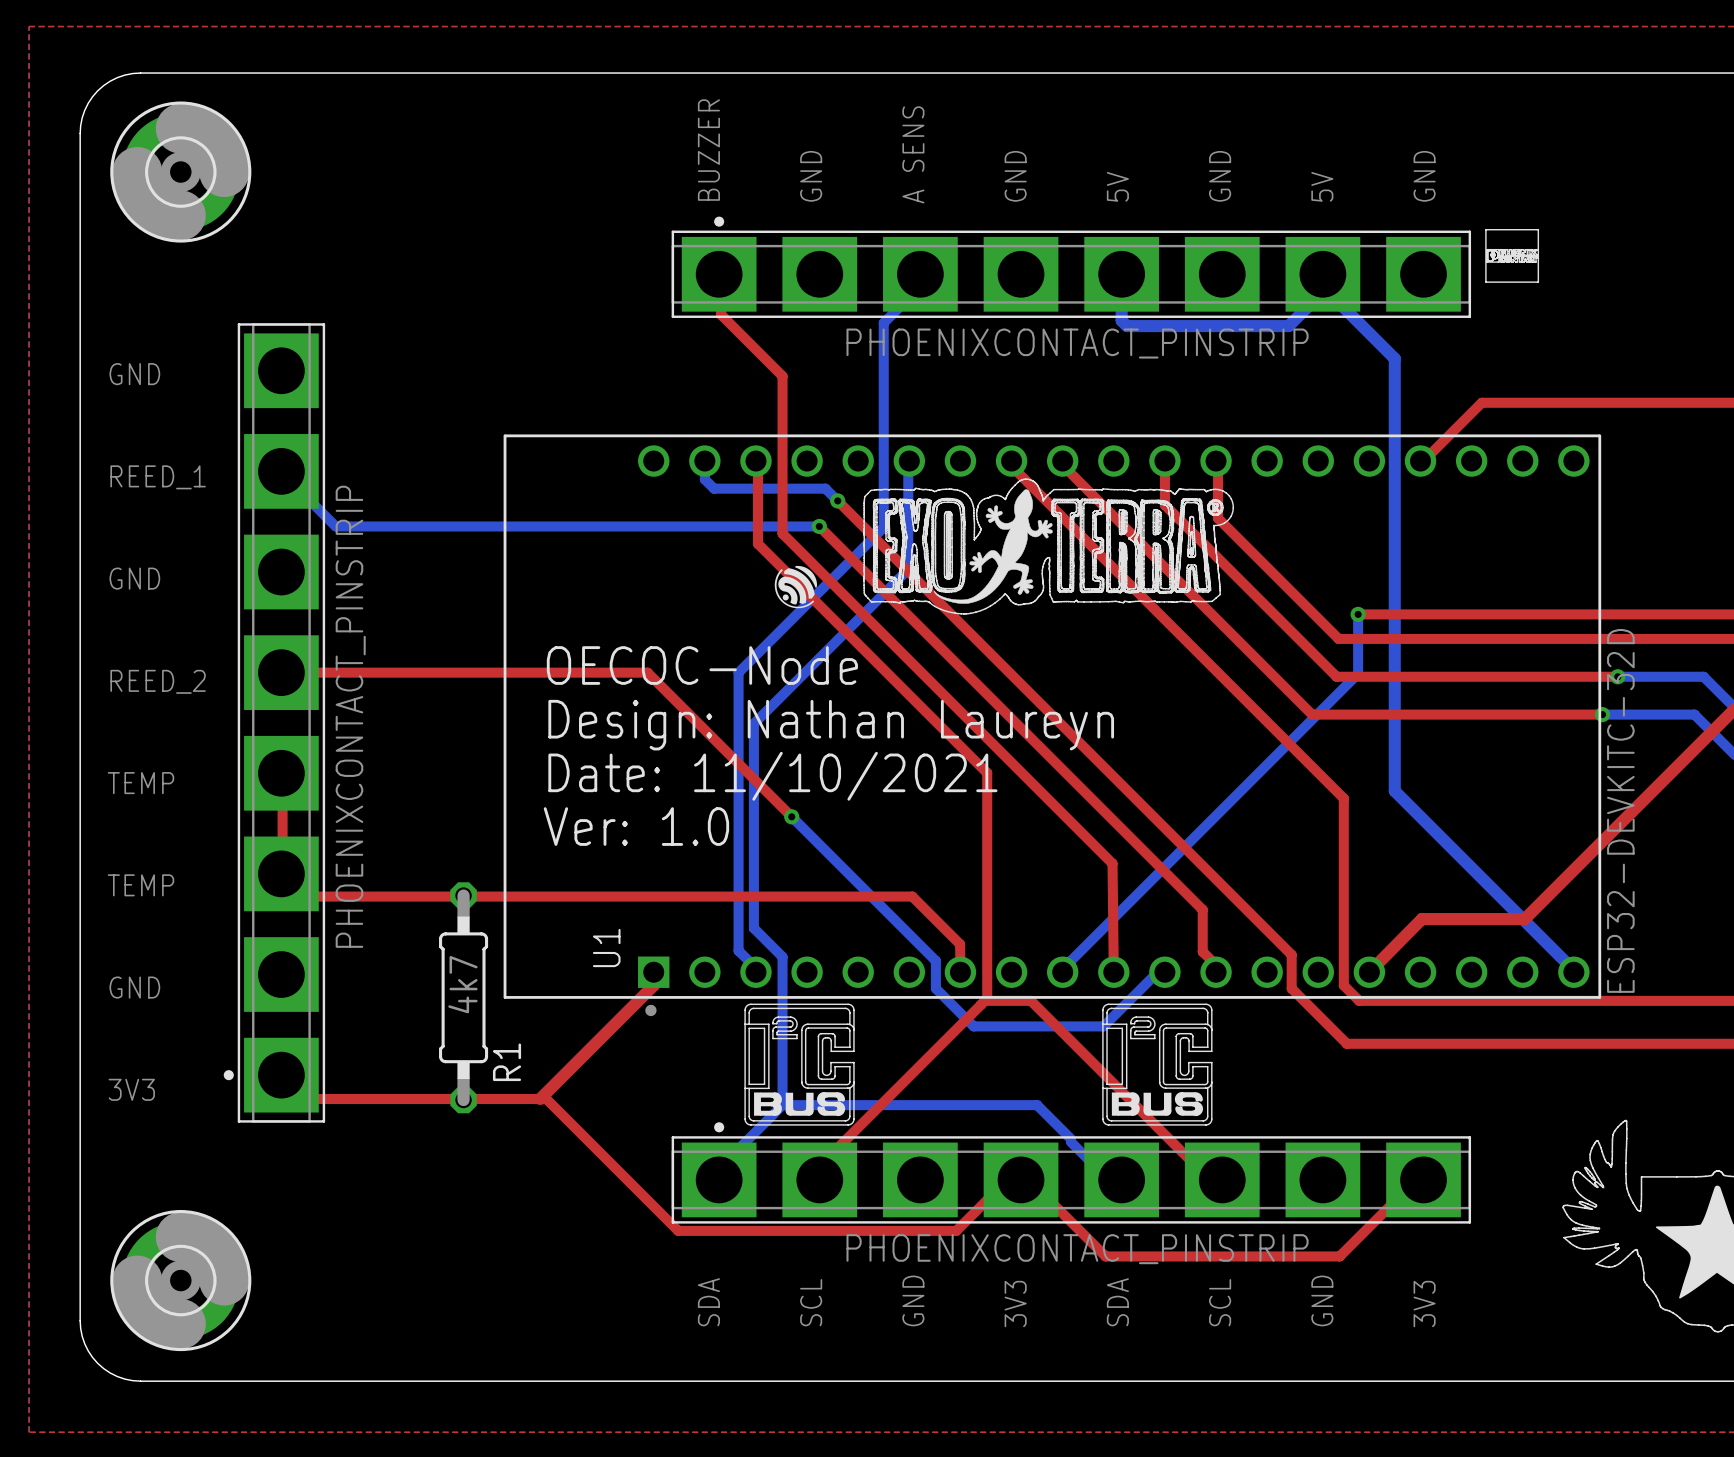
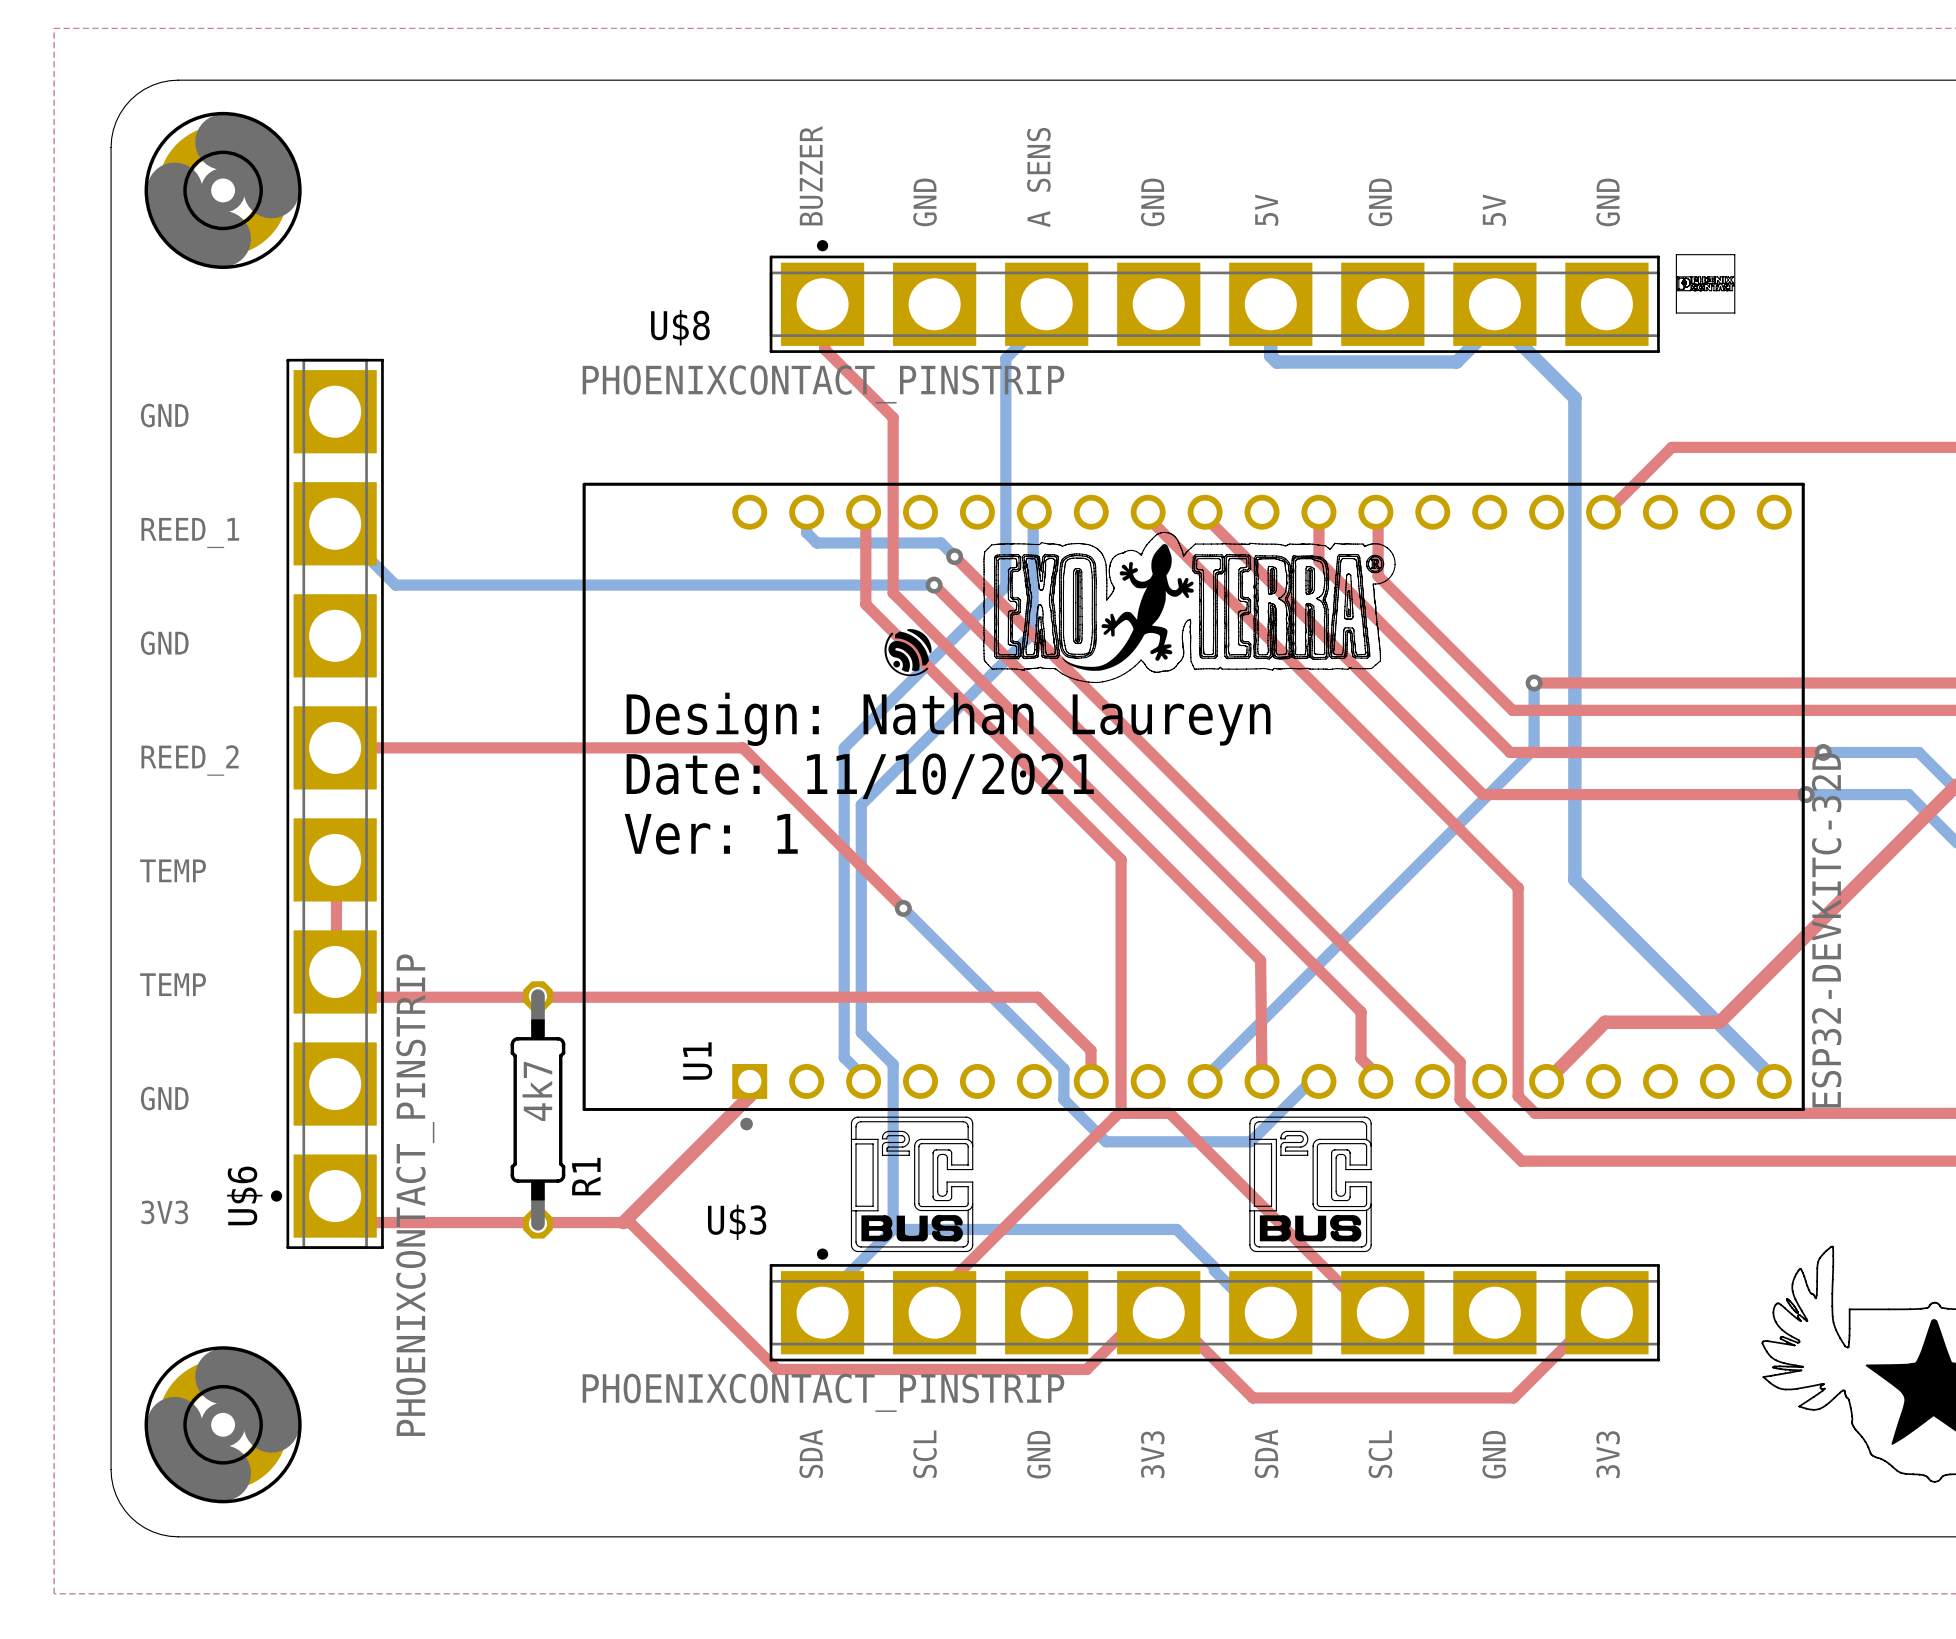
U$8 name: none -> U$8 (680, 327)
U$8 value position: PHOENIXCONTACT_PINSTRIP (1077, 343) -> PHOENIXCONTACT_PINSTRIP (823, 384)
drawing shape: [863, 478, 1234, 615] -> [983, 532, 1396, 683]
text: OECOC-Node (702, 665) -> none
U$6 value position: PHOENIXCONTACT_PINSTRIP (350, 716) -> PHOENIXCONTACT_PINSTRIP (415, 1195)
text position: Design: Nathan Laureyn (831, 725) -> Design: Nathan Laureyn (948, 719)
text: none -> Ver: 1 (711, 834)
text position: Date: 11/10/2021 (772, 776) -> Date: 11/10/2021 (860, 776)
text: Ver: 1.0 (636, 826) -> none
U$6 name: none -> U$6 (244, 1195)
U$3 name: none -> U$3 (737, 1222)
U$3 value position: PHOENIXCONTACT_PINSTRIP (1077, 1249) -> PHOENIXCONTACT_PINSTRIP (823, 1392)

